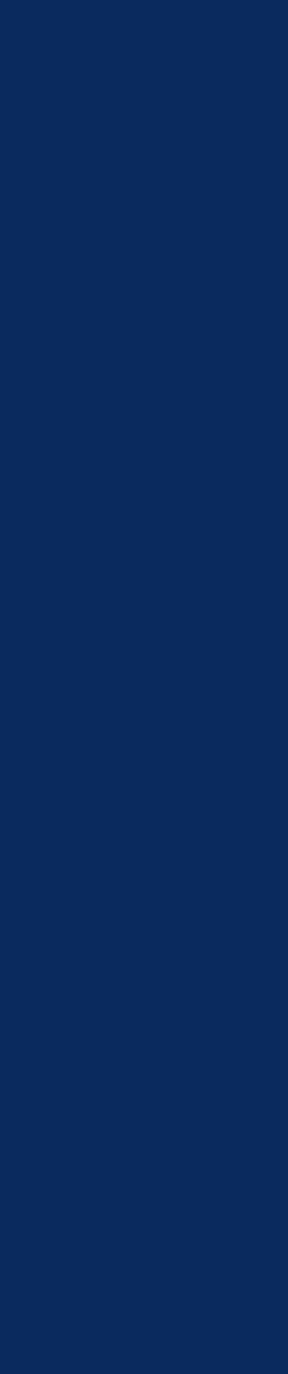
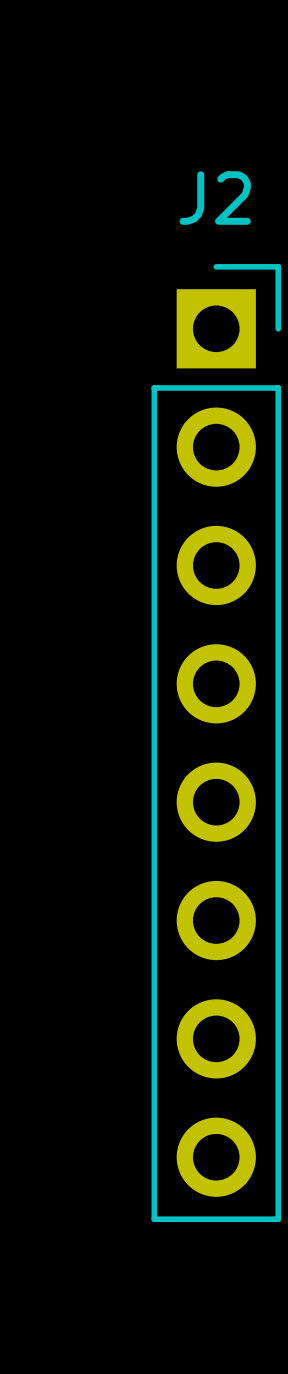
J2: none -> (216, 743)

